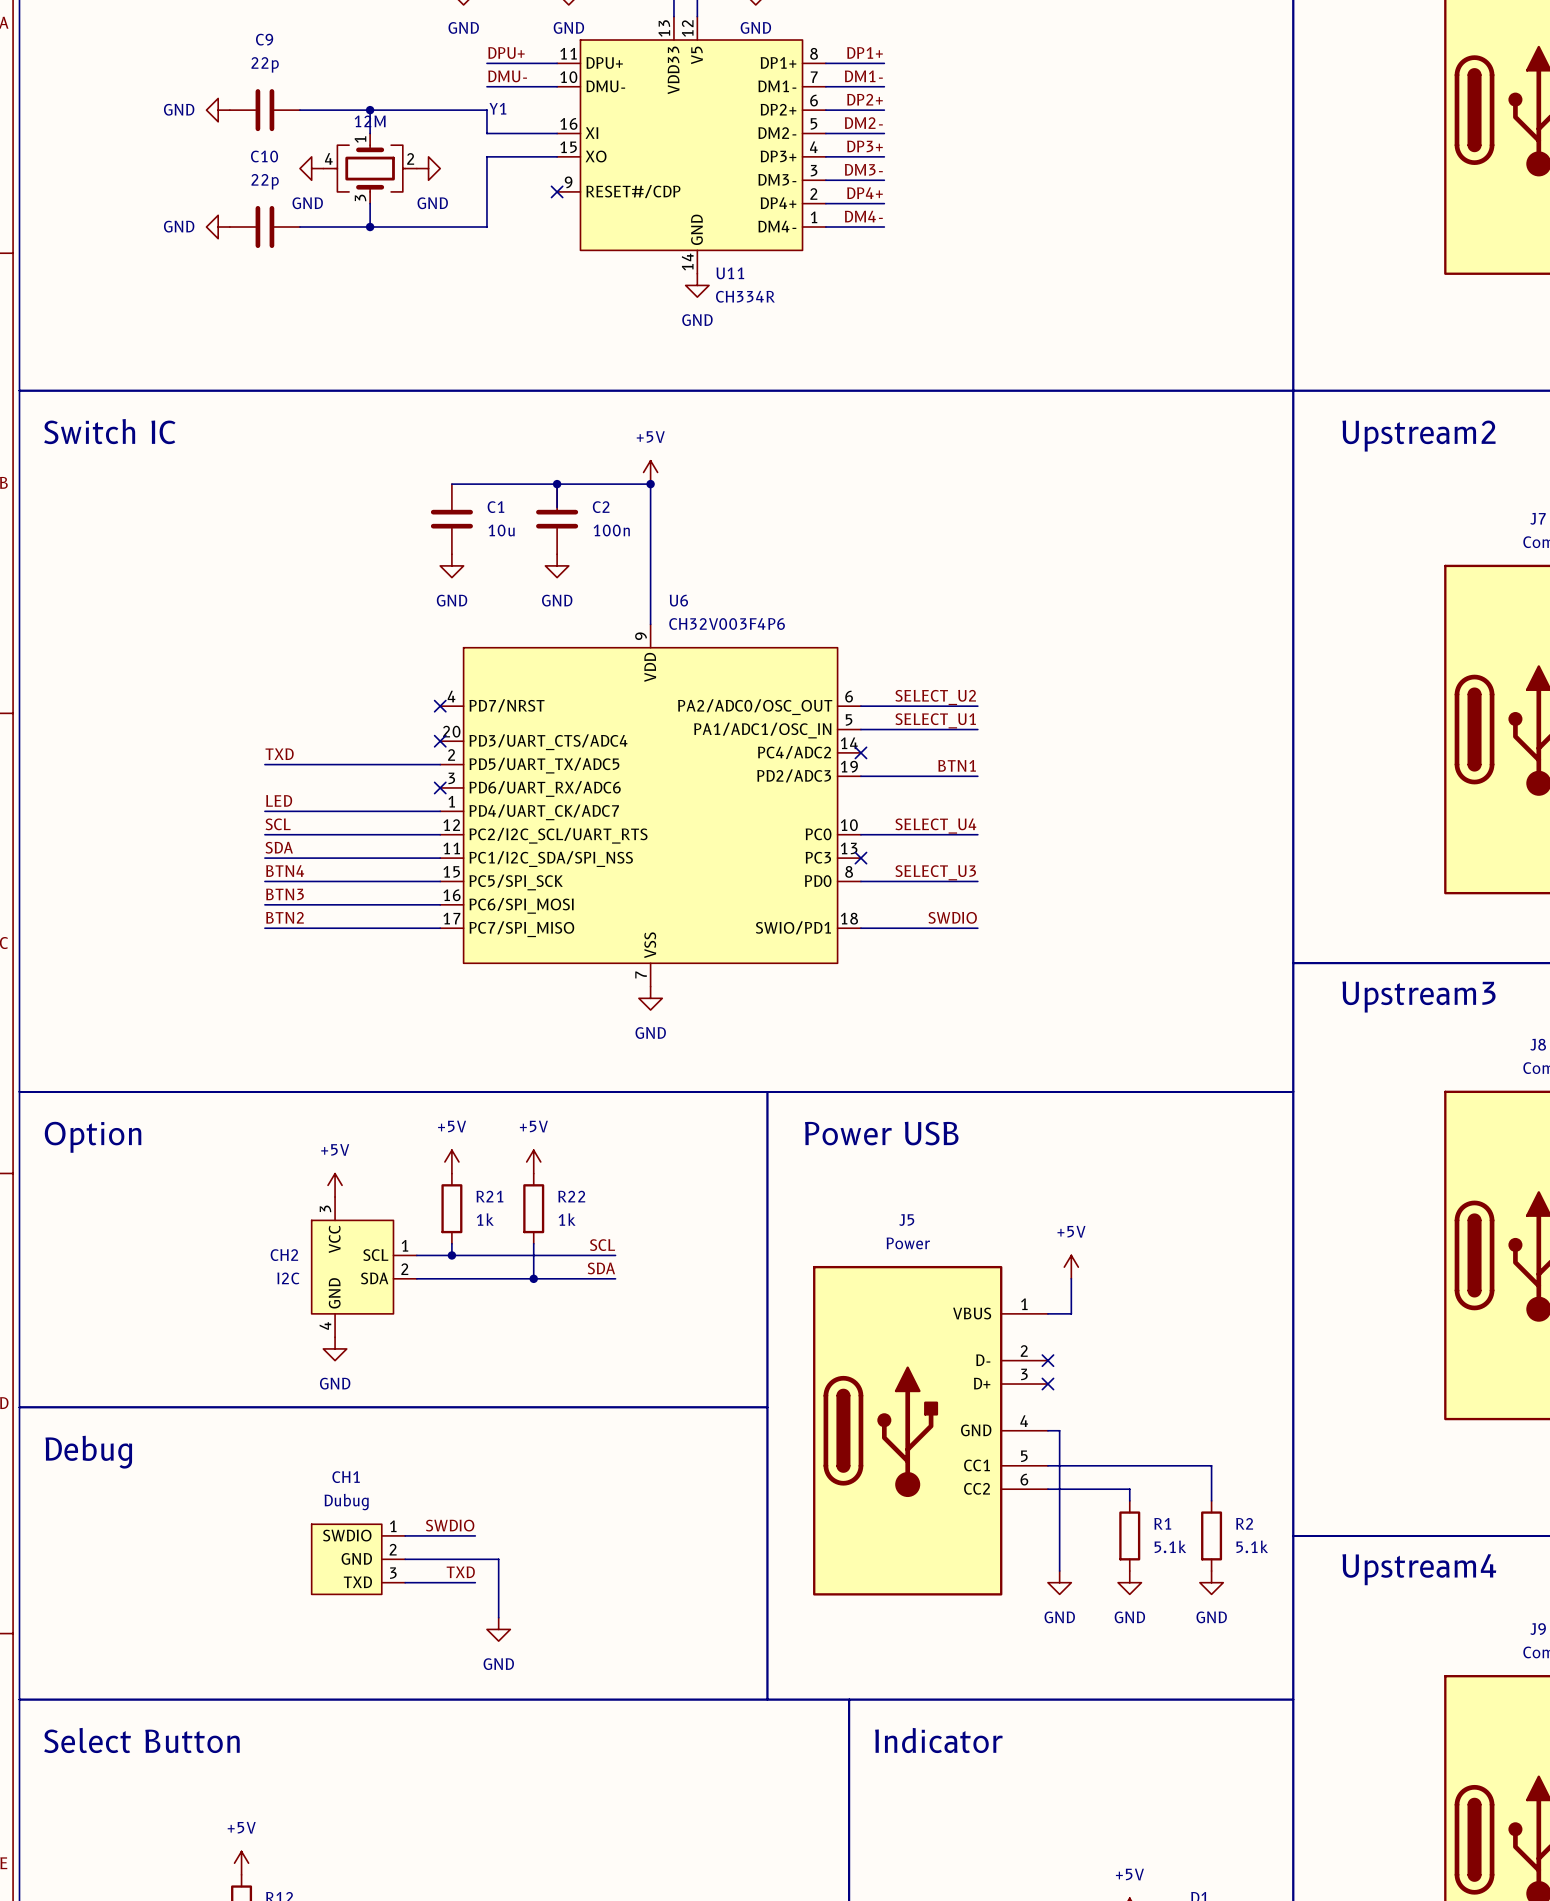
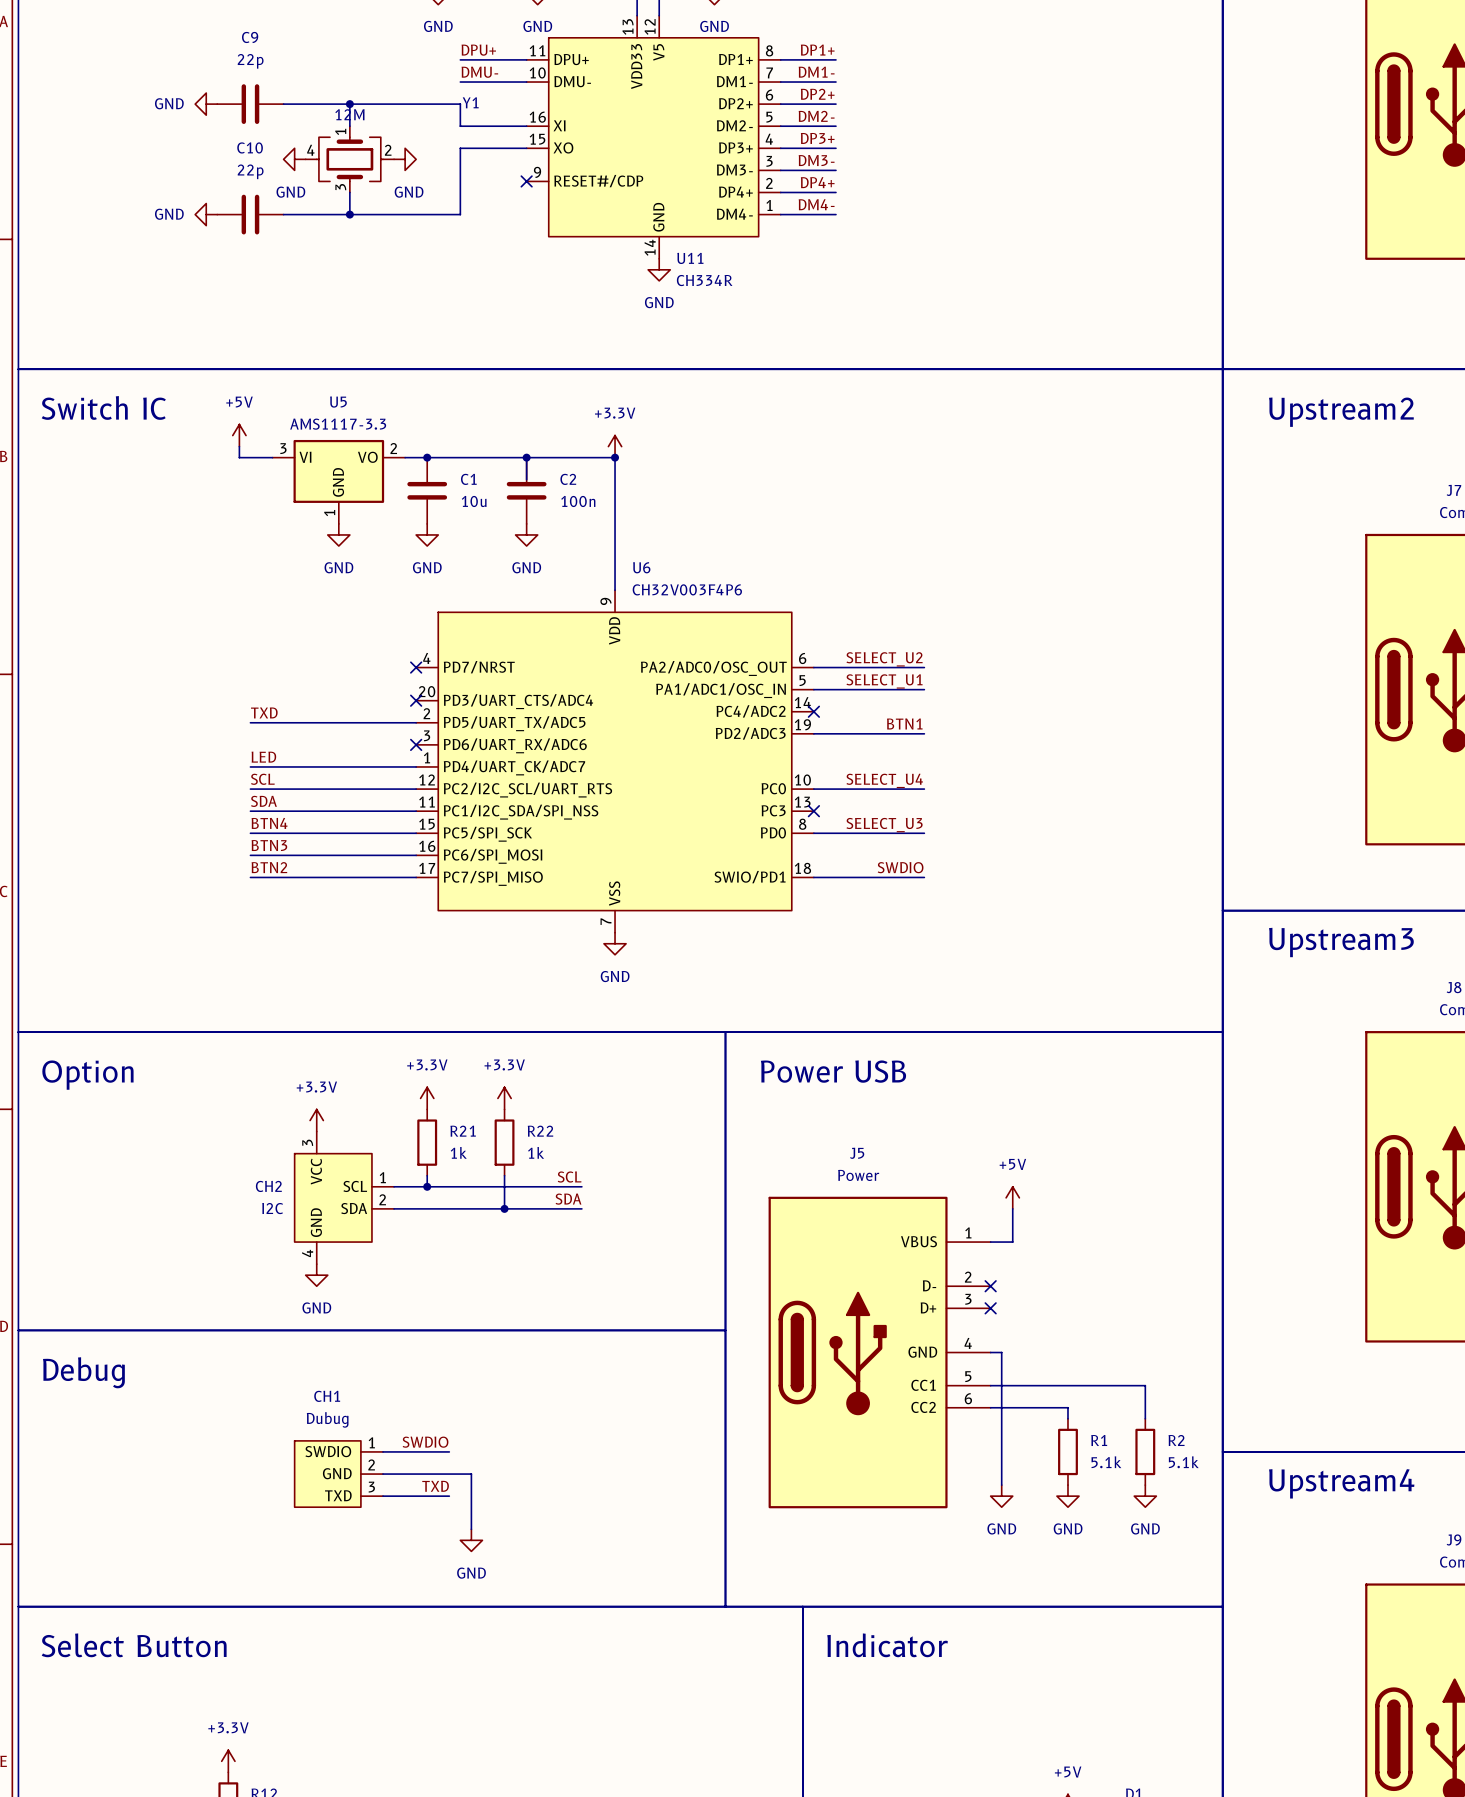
power symbol: none -> +5V (239, 435)
wire: none -> (239, 446) (239, 457) (272, 457)
power symbol: +5V (650, 472) -> +3.3V (615, 446)
wire: none -> (405, 457) (427, 457)
junction: none -> (427, 457)
U5: none -> AMS1117-3.3 (338, 481)
power symbol: none -> GND (338, 534)
power symbol: +5V (451, 1161) -> +3.3V (427, 1098)
power symbol: +5V (533, 1161) -> +3.3V (504, 1098)
power symbol: +5V (335, 1185) -> +3.3V (316, 1120)
power symbol: +5V (241, 1863) -> +3.3V (228, 1761)

